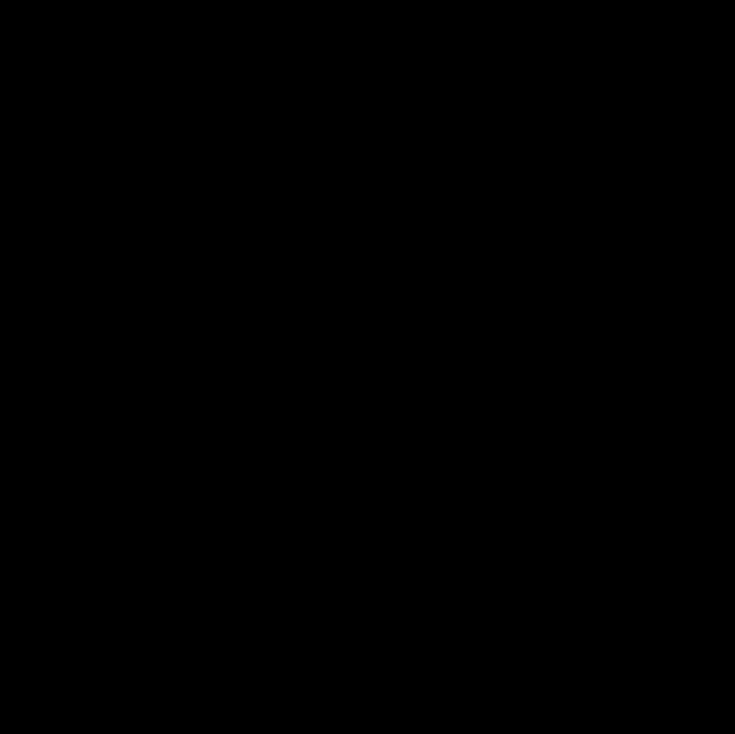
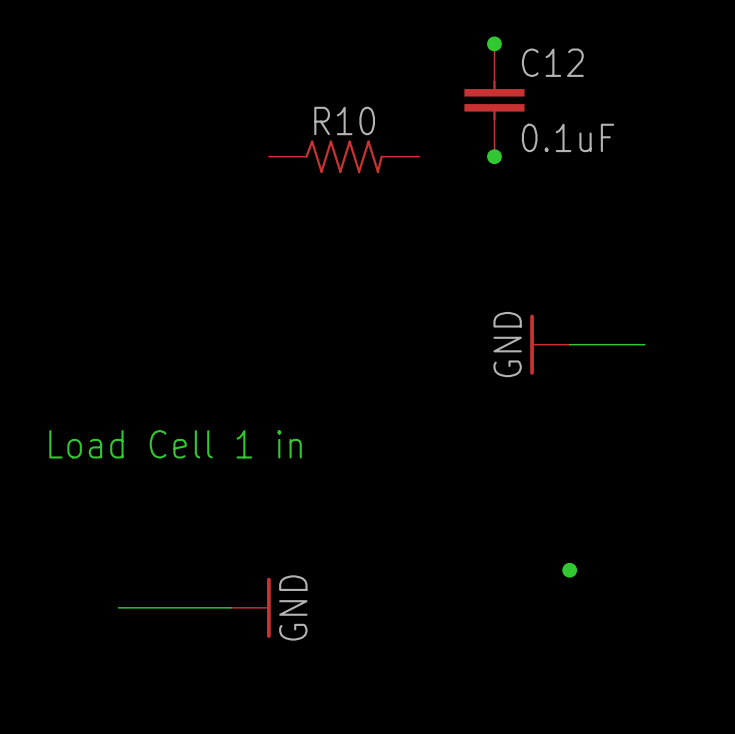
junction: none -> (494, 43)
C12: none -> 0.1uF (494, 100)
R10: none -> (344, 156)
junction: none -> (494, 156)
power symbol: none -> GND (549, 344)
wire: none -> (569, 344) (644, 344)
text: none -> Load Cell 1 in (175, 444)
junction: none -> (569, 570)
wire: none -> (118, 607) (231, 607)
power symbol: none -> GND (251, 607)

